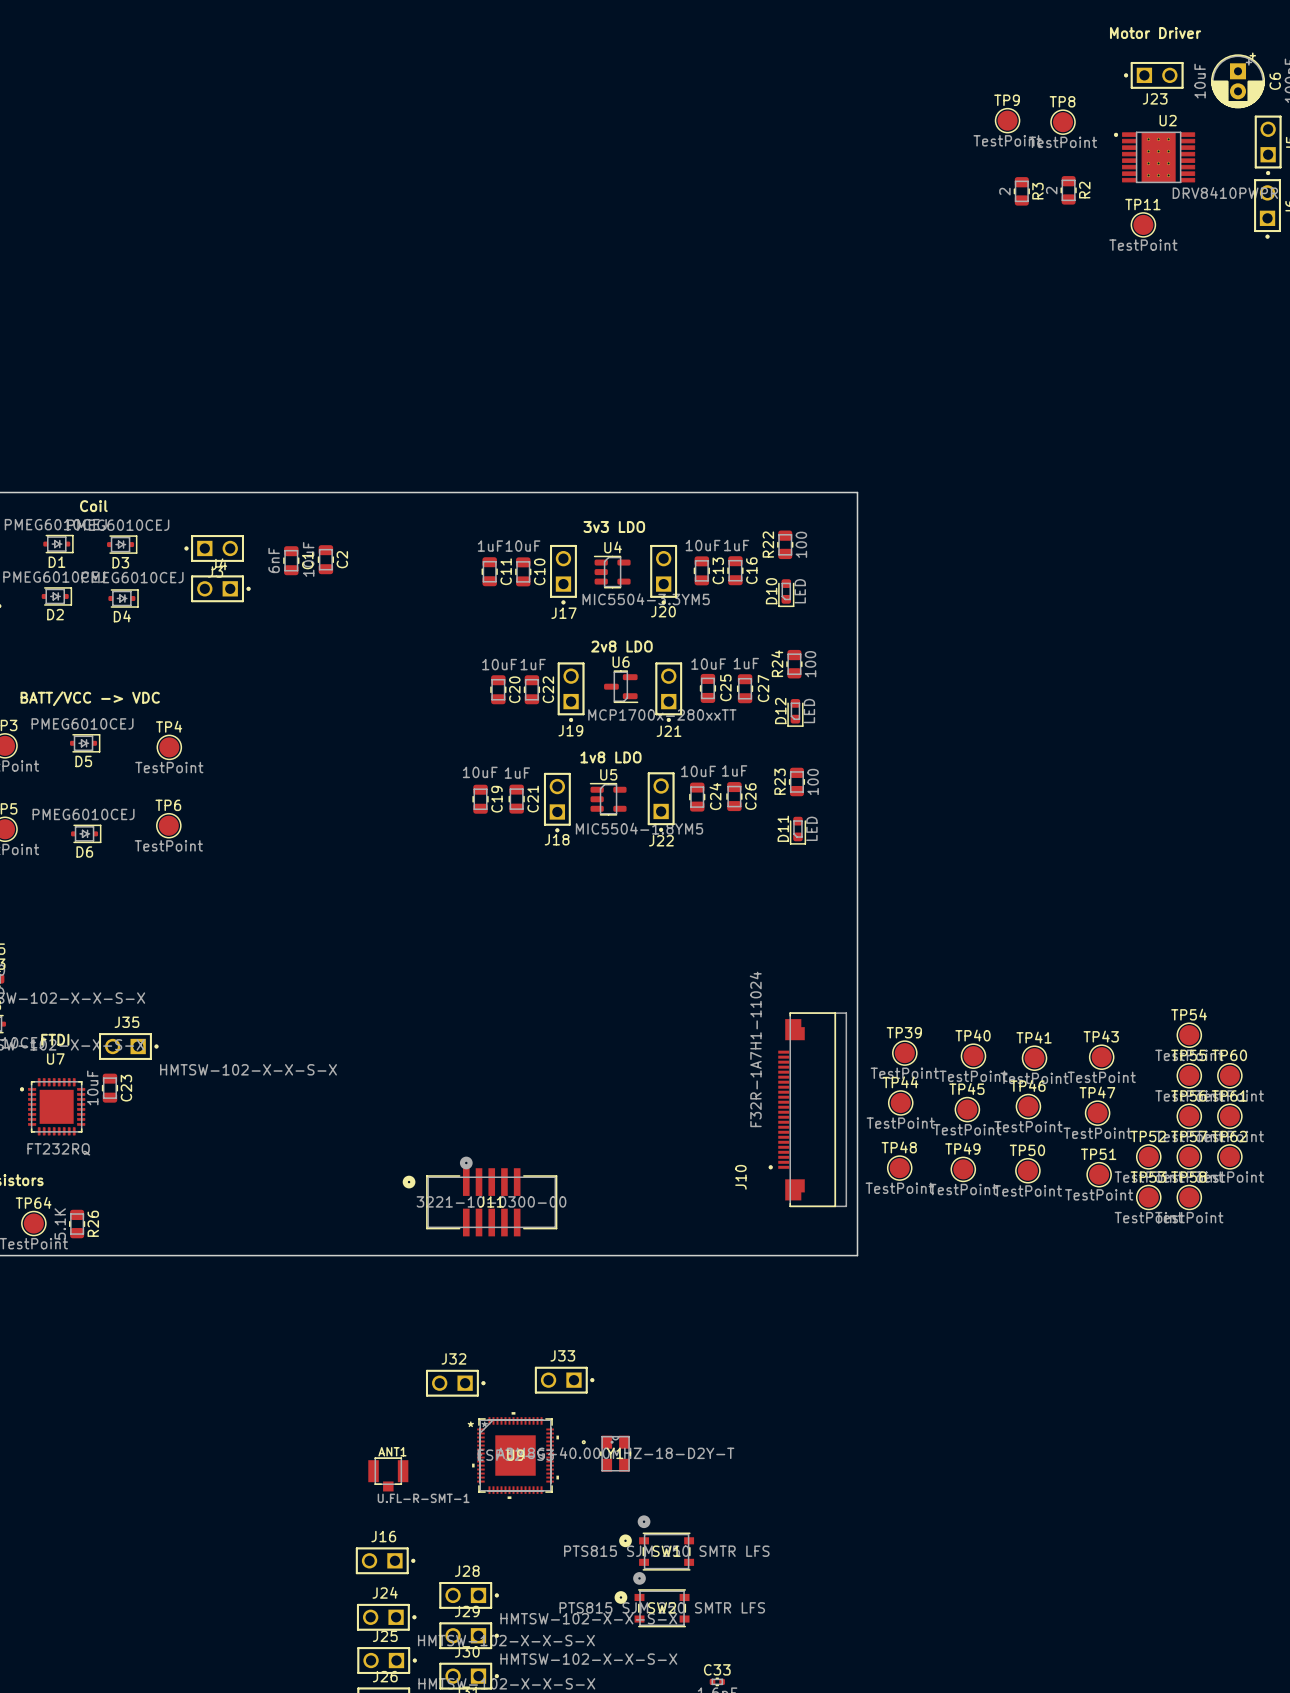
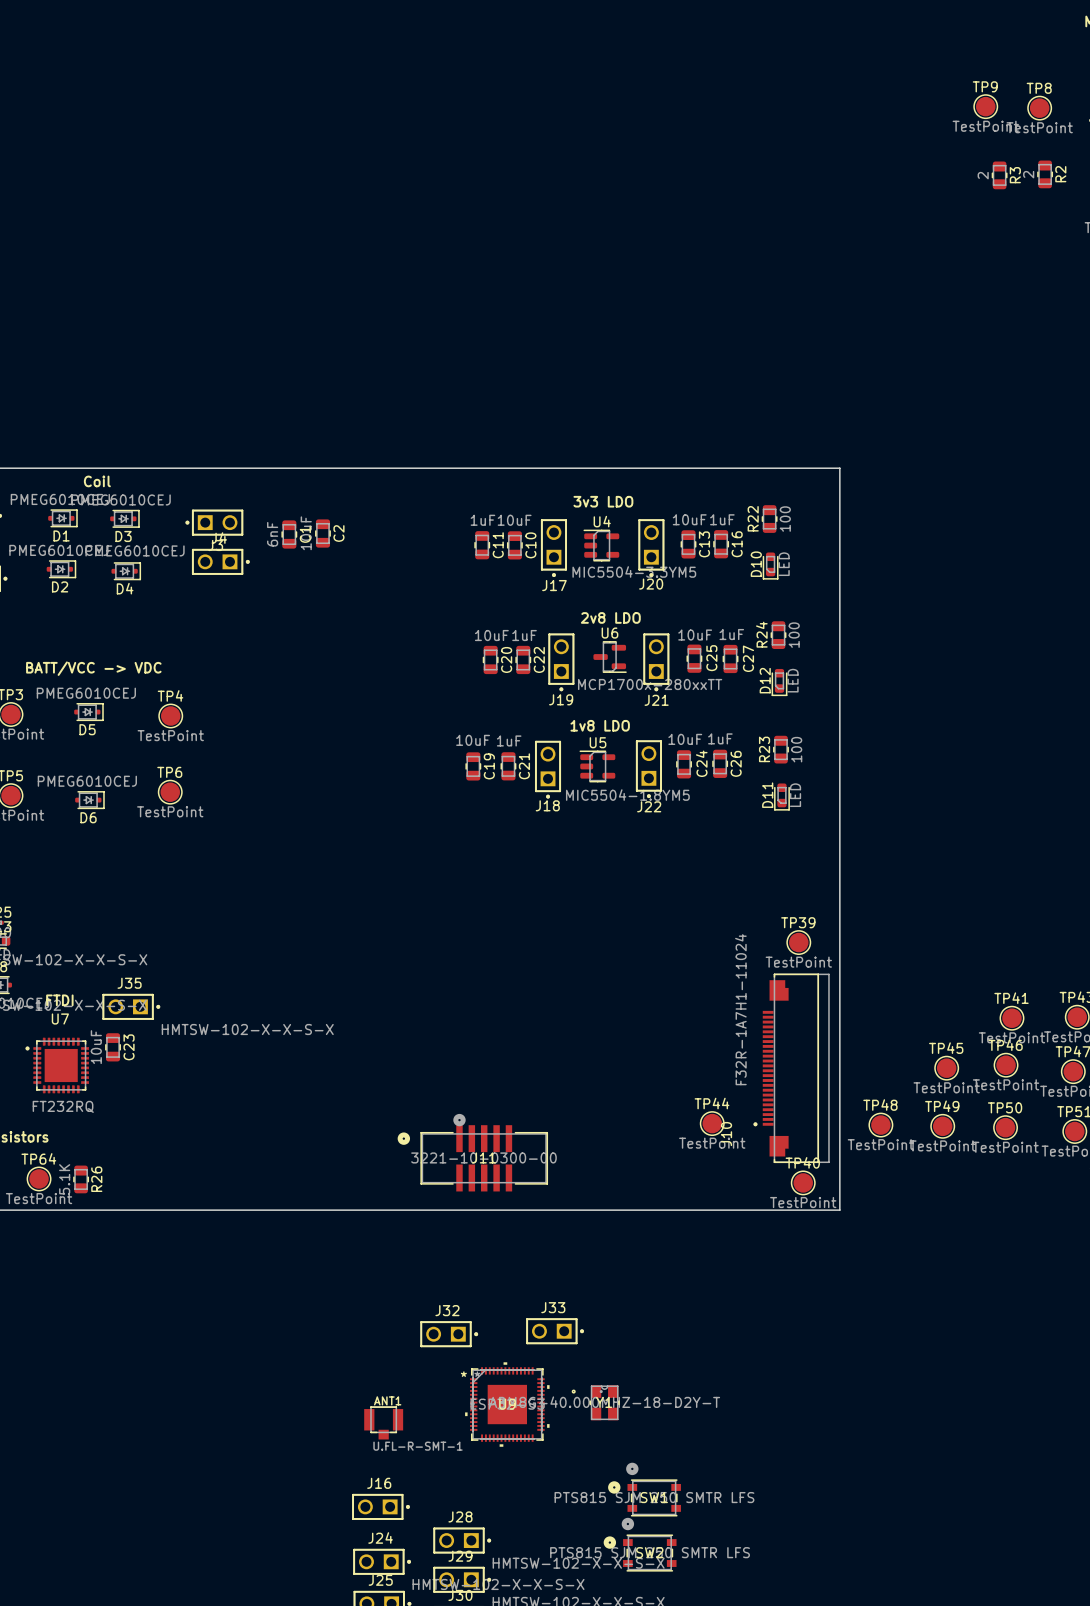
TP39 position: (904, 1053) -> (798, 942)
TP40 position: (973, 1056) -> (803, 1182)
TP44 position: (900, 1102) -> (712, 1123)

